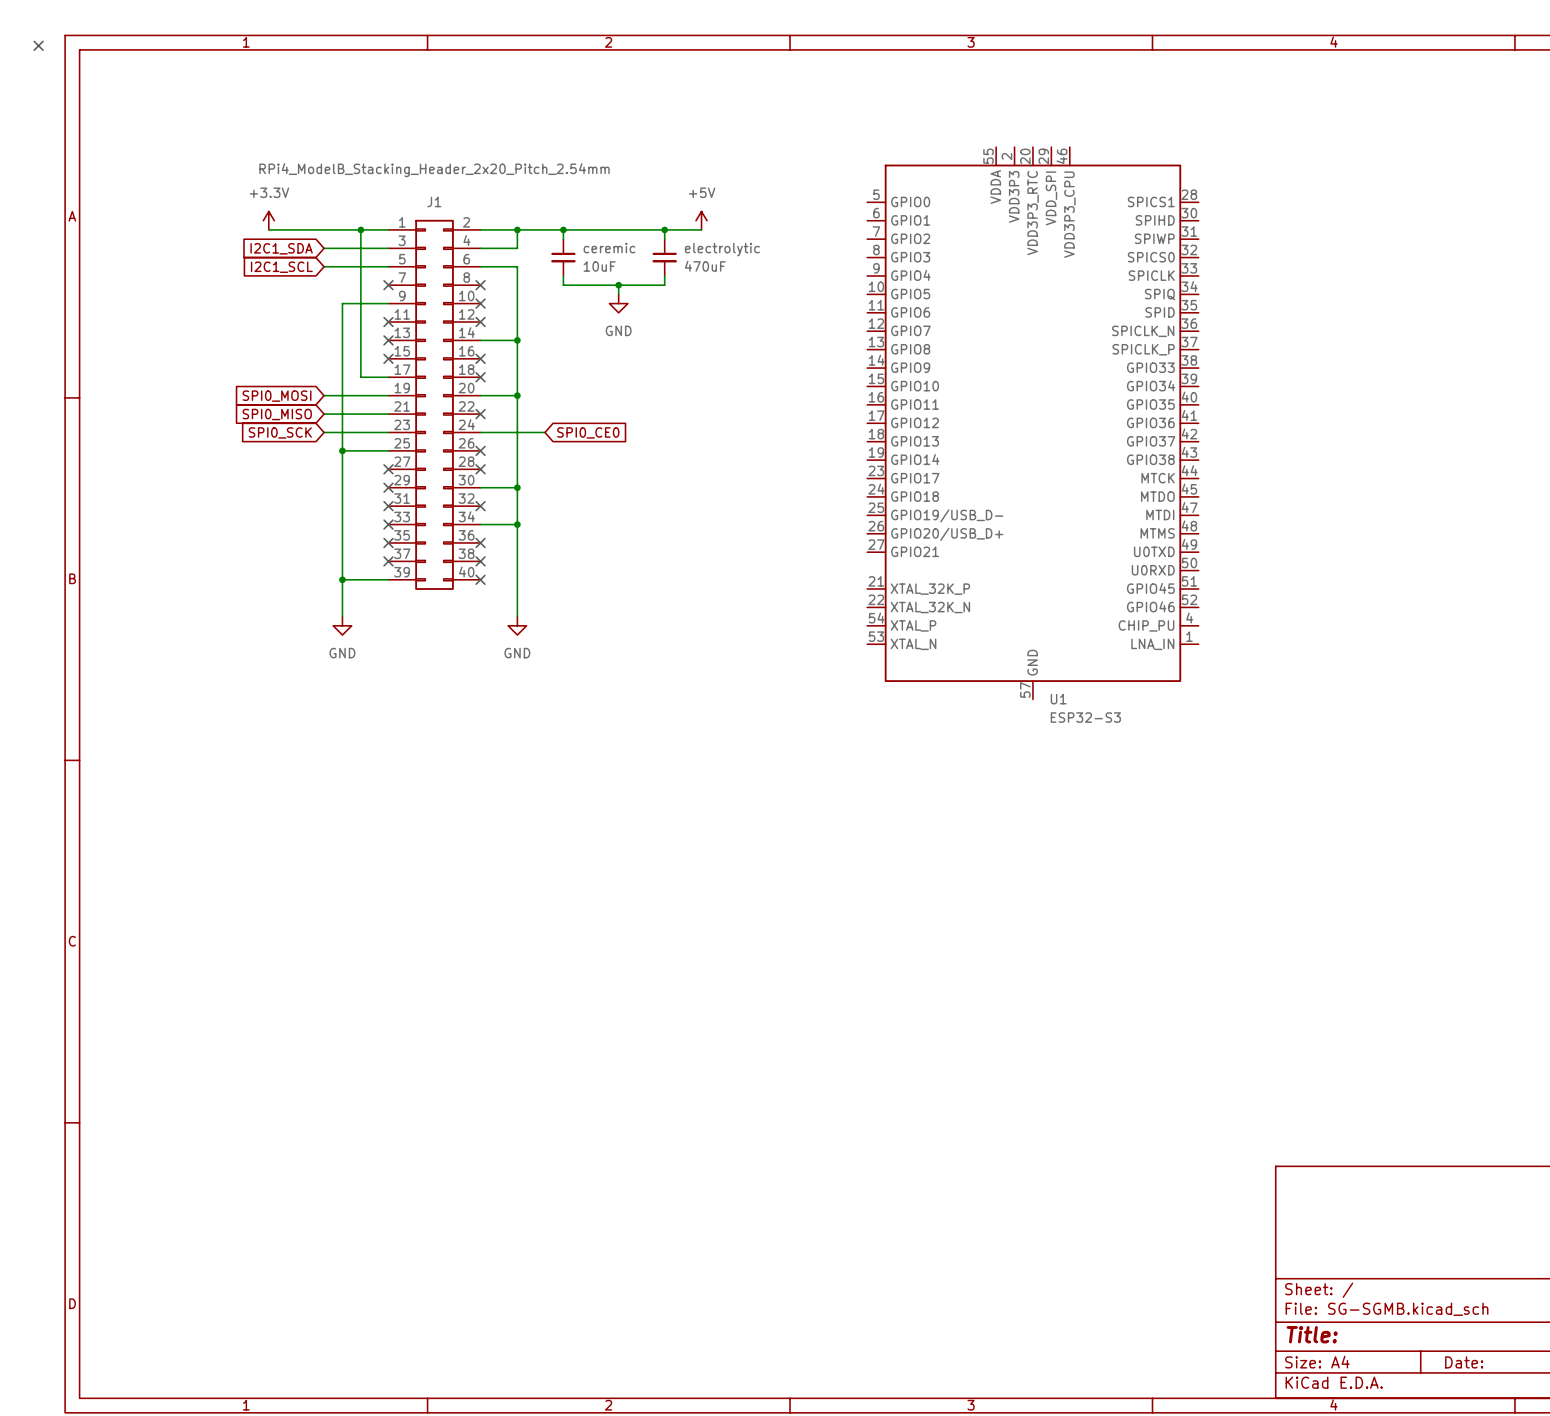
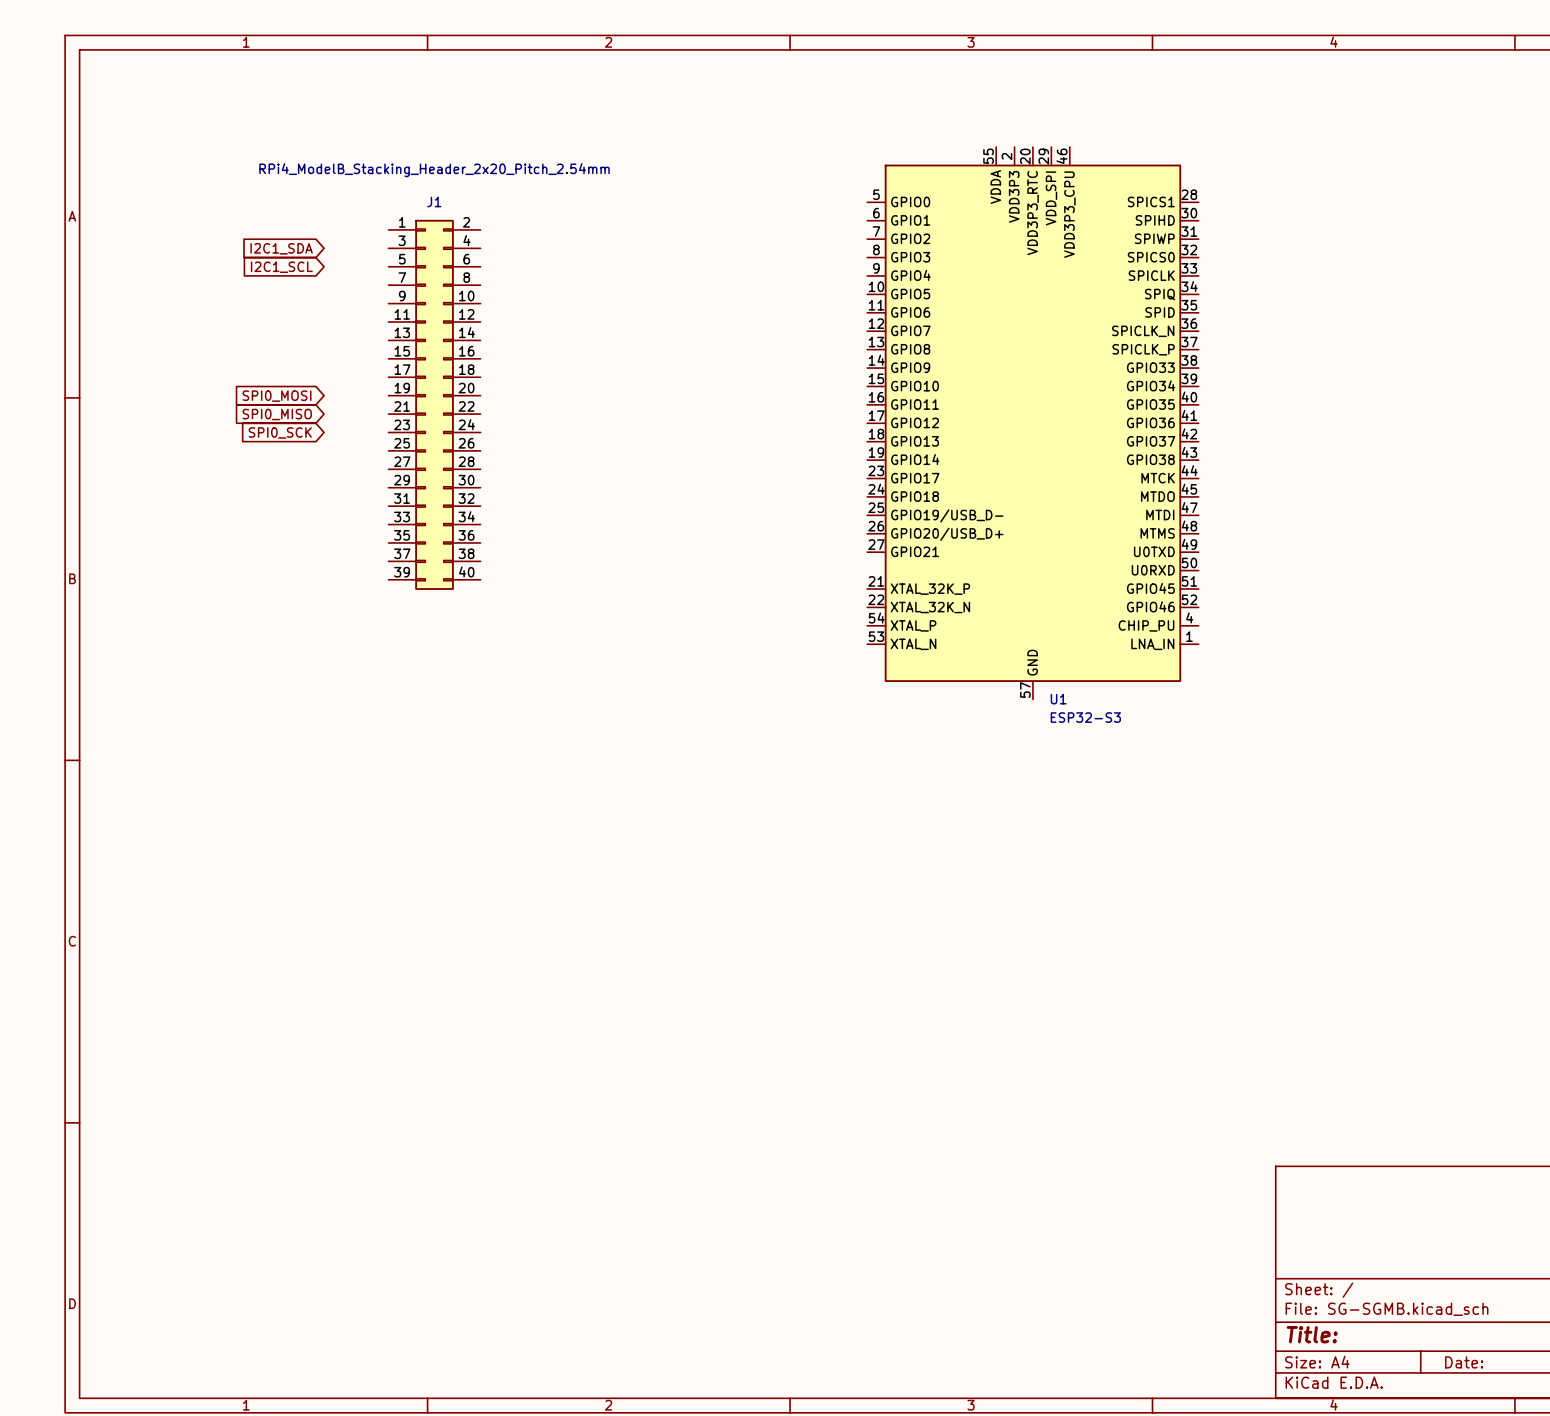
no-connect mark: (38, 45) -> none
power symbol: +3.3V (268, 220) -> none
power symbol: +5V (701, 220) -> none
wire: (268, 229) (388, 229) -> none
wire: (360, 229) (360, 377) (388, 377) -> none
junction: (360, 229) -> none
wire: (480, 229) (701, 229) -> none
wire: (517, 229) (517, 248) (480, 248) -> none
junction: (517, 229) -> none
wire: (563, 229) (563, 239) -> none
junction: (563, 229) -> none
wire: (664, 229) (664, 239) -> none
junction: (664, 229) -> none
wire: (324, 248) (388, 248) -> none
ceremic: 10uF (563, 257) -> none
electrolytic: 470uF (664, 257) -> none
wire: (324, 266) (388, 266) -> none
wire: (480, 266) (517, 266) (517, 616) -> none
wire: (563, 275) (563, 285) (664, 285) (664, 275) -> none
no-connect mark: (388, 285) -> none
no-connect mark: (480, 285) -> none
wire: (618, 285) (618, 294) -> none
junction: (618, 285) -> none
wire: (388, 303) (342, 303) (342, 616) -> none
no-connect mark: (480, 303) -> none
power symbol: GND (618, 303) -> none
no-connect mark: (388, 322) -> none
no-connect mark: (480, 322) -> none
no-connect mark: (388, 340) -> none
wire: (480, 340) (517, 340) -> none
junction: (517, 340) -> none
no-connect mark: (388, 358) -> none
no-connect mark: (480, 358) -> none
no-connect mark: (480, 377) -> none
wire: (324, 395) (388, 395) -> none
wire: (480, 395) (517, 395) -> none
junction: (517, 395) -> none
wire: (324, 414) (388, 414) -> none
no-connect mark: (480, 414) -> none
wire: (324, 432) (388, 432) -> none
wire: (480, 432) (545, 432) -> none
global label: SPI0_CE0 (588, 432) -> none
wire: (342, 450) (388, 450) -> none
junction: (342, 450) -> none
no-connect mark: (480, 450) -> none
no-connect mark: (388, 469) -> none
no-connect mark: (480, 469) -> none
no-connect mark: (388, 487) -> none
wire: (480, 487) (517, 487) -> none
junction: (517, 487) -> none
no-connect mark: (388, 506) -> none
no-connect mark: (480, 506) -> none
no-connect mark: (388, 524) -> none
wire: (480, 524) (517, 524) -> none
junction: (517, 524) -> none
no-connect mark: (388, 542) -> none
no-connect mark: (480, 542) -> none
no-connect mark: (388, 561) -> none
no-connect mark: (480, 561) -> none
wire: (342, 579) (388, 579) -> none
junction: (342, 579) -> none
no-connect mark: (480, 579) -> none
power symbol: GND (342, 625) -> none
power symbol: GND (517, 625) -> none

